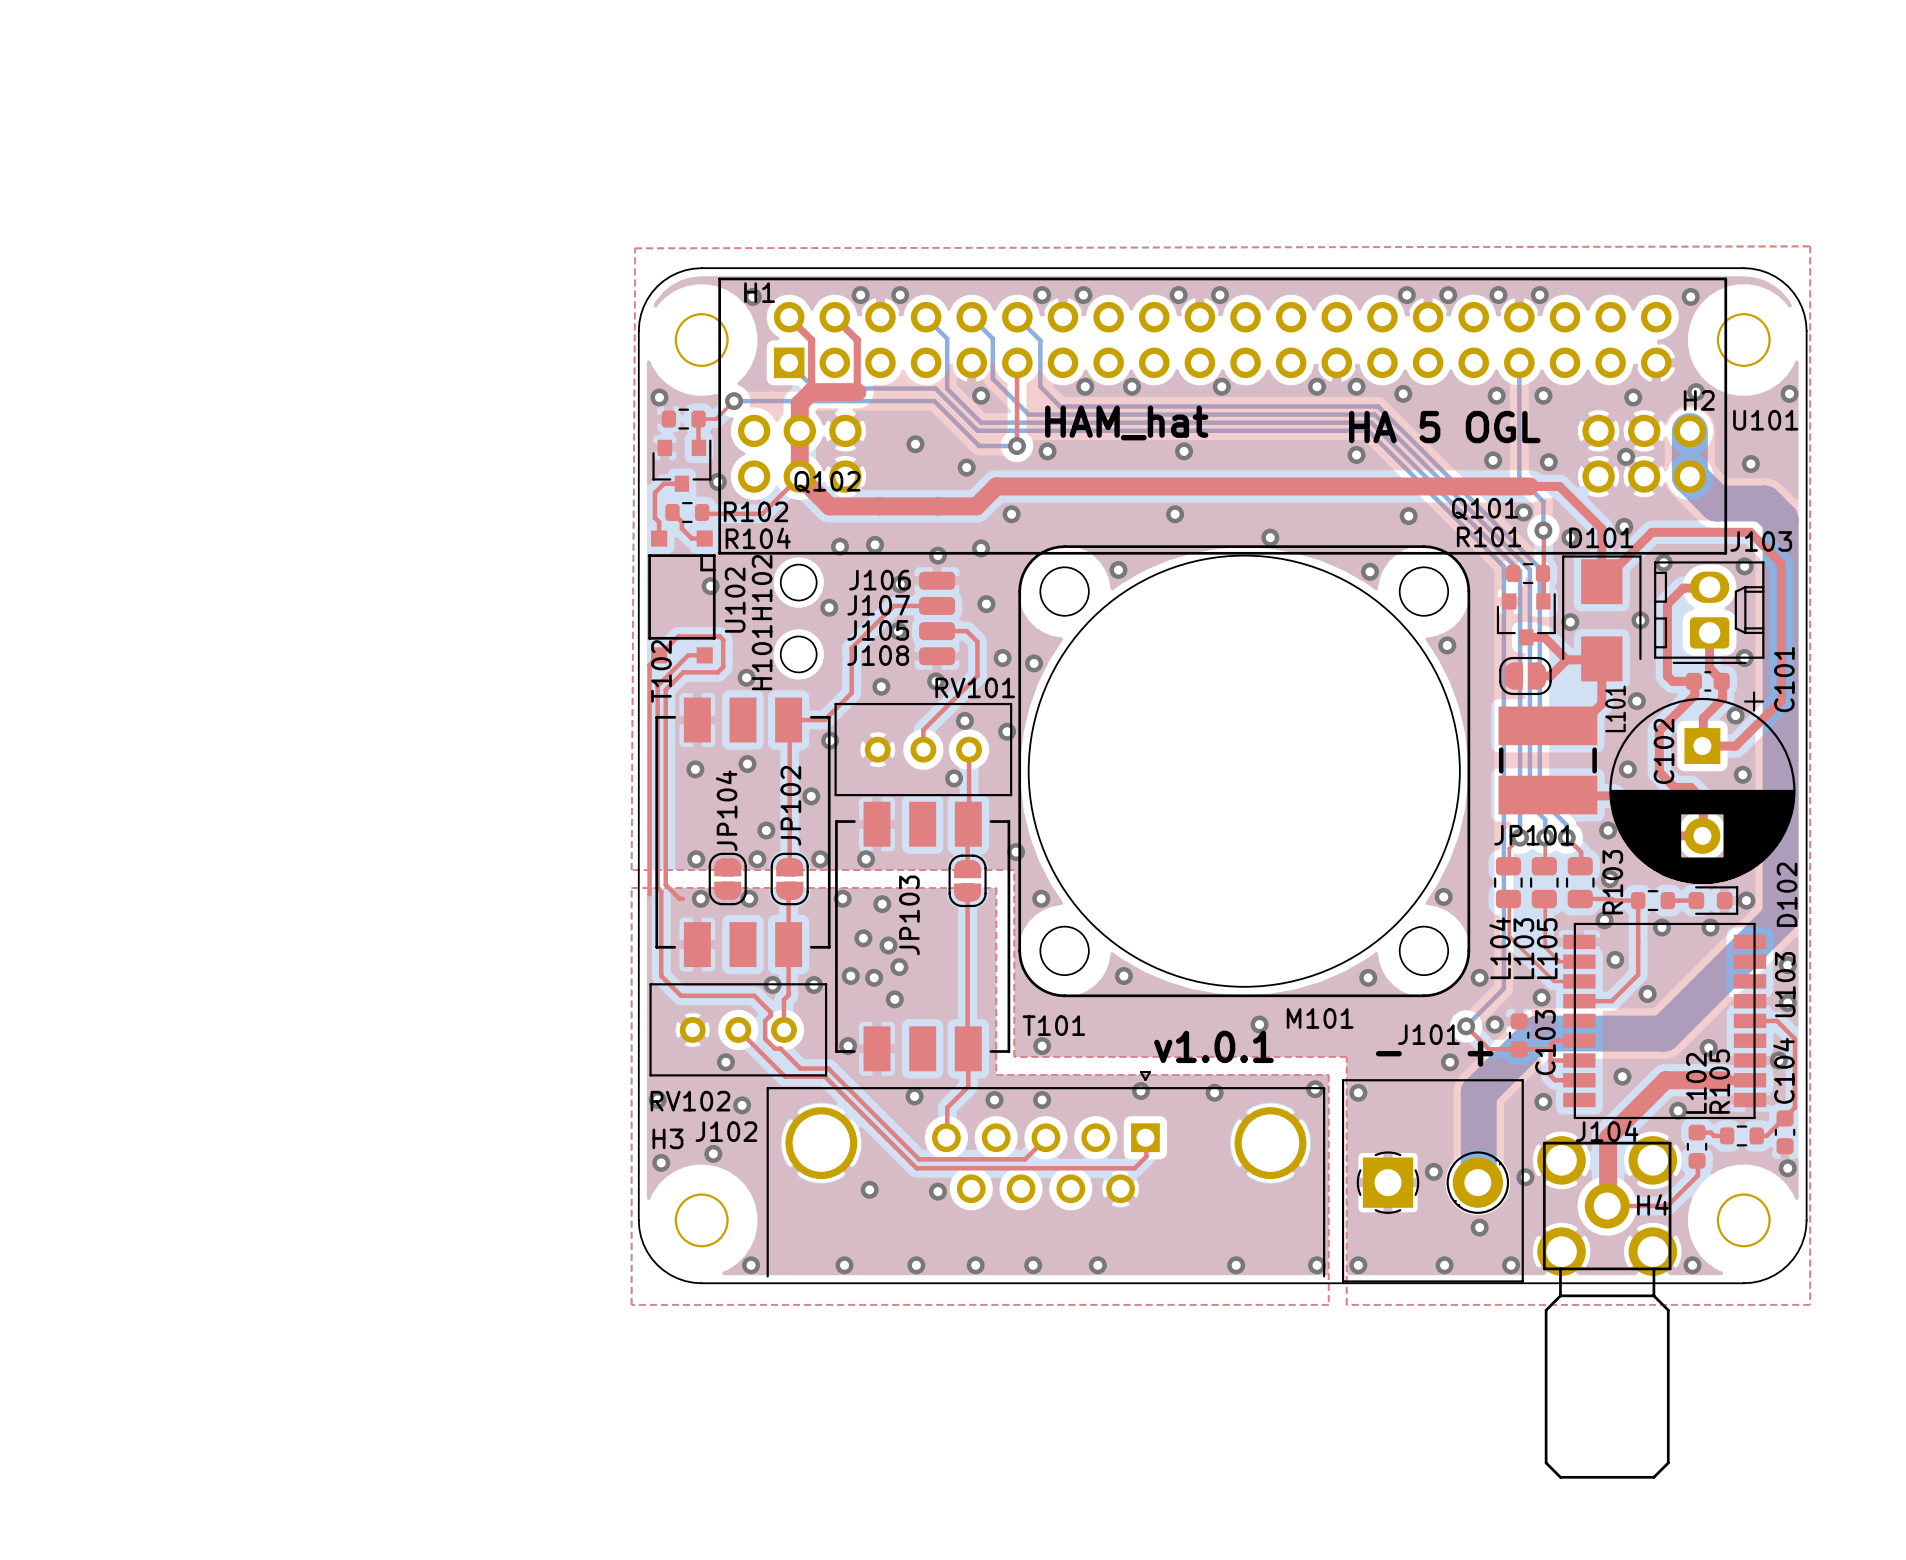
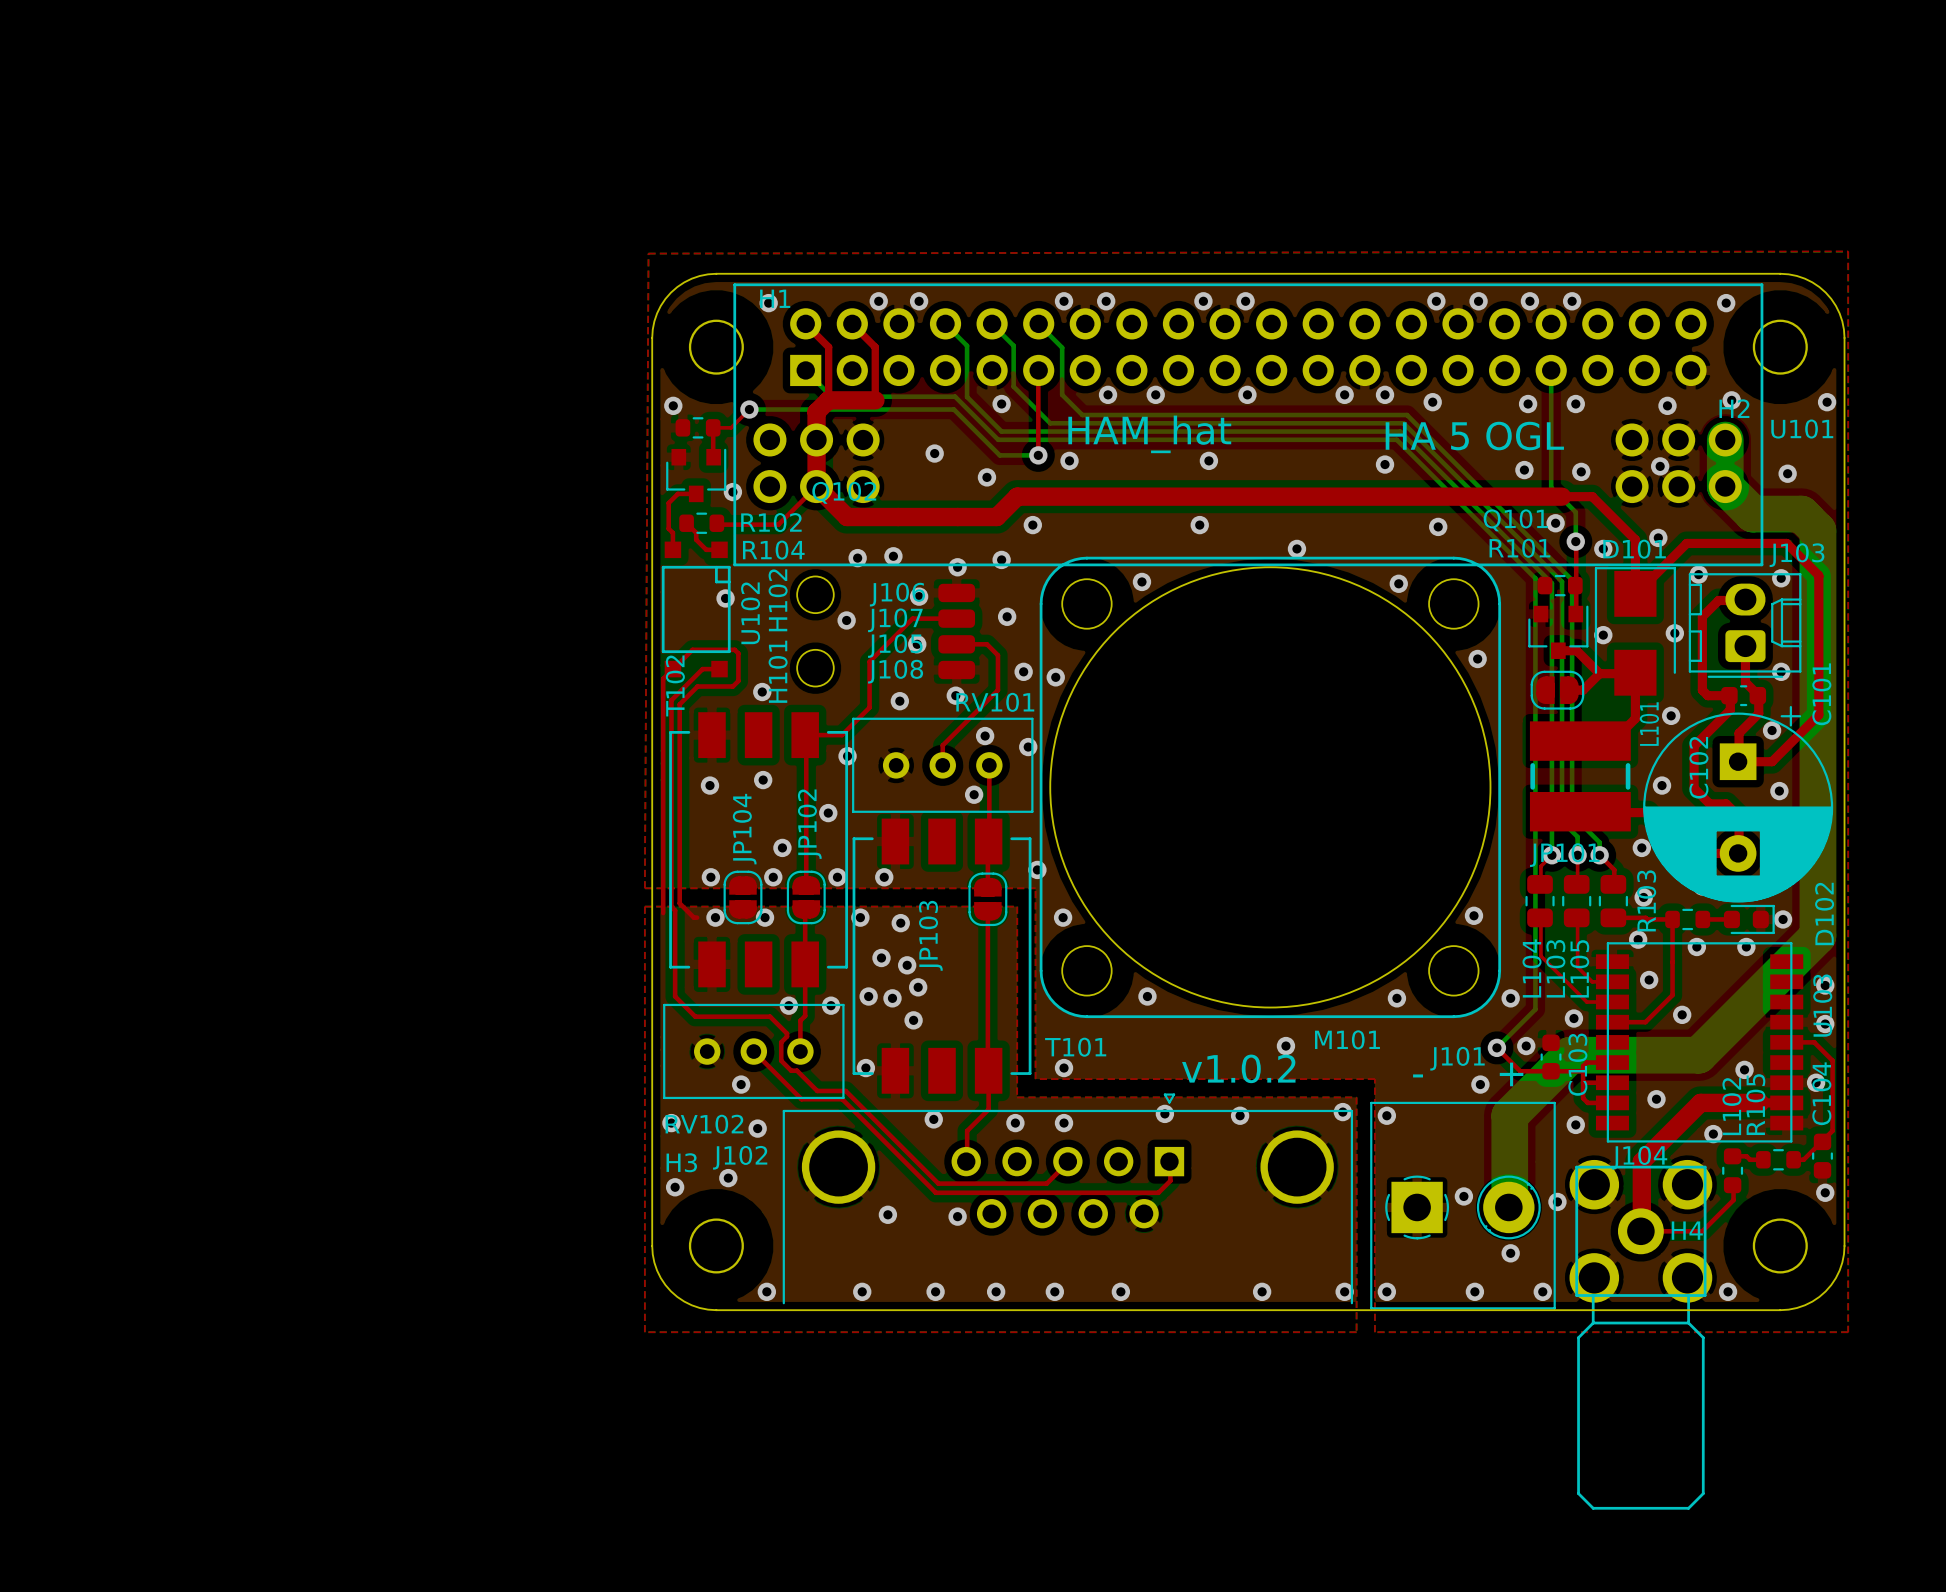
text: v1.0.1 (1213, 1046) -> v1.0.2 (1238, 1068)

